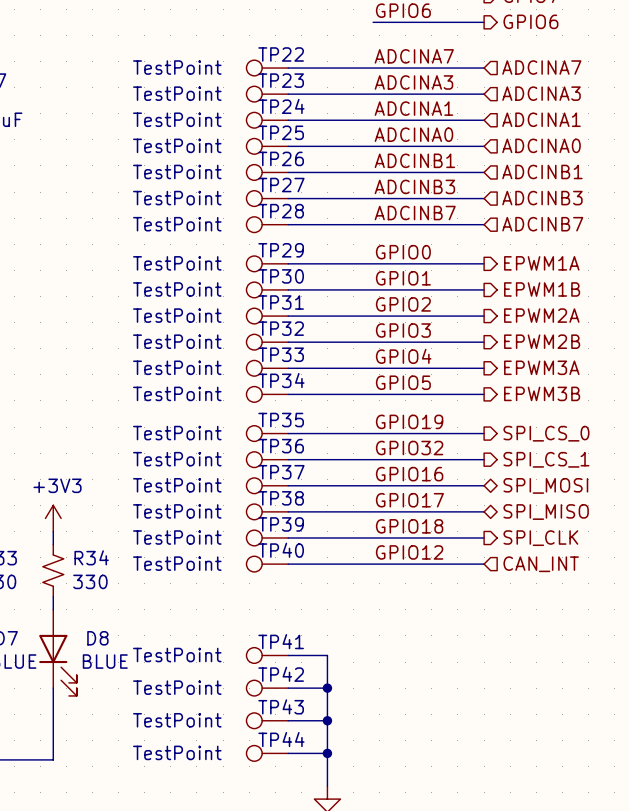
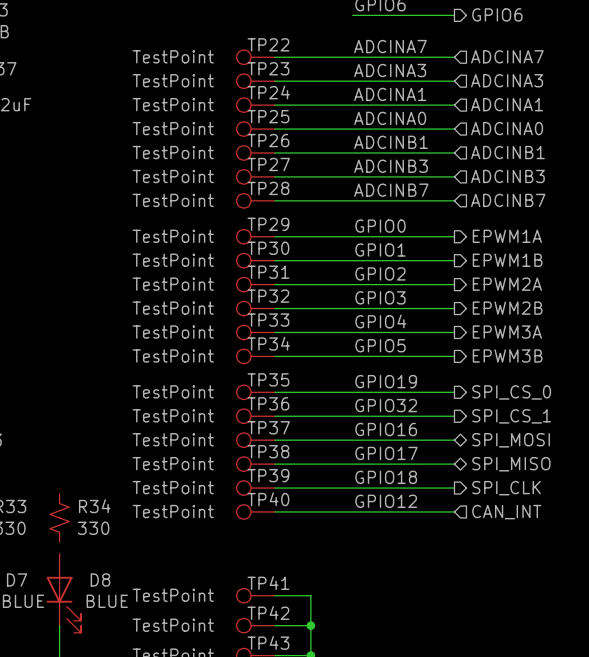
power symbol: +3V3 (53, 518) -> none
wire: (53, 531) (53, 544) -> none
wire: (53, 596) (53, 609) -> none

